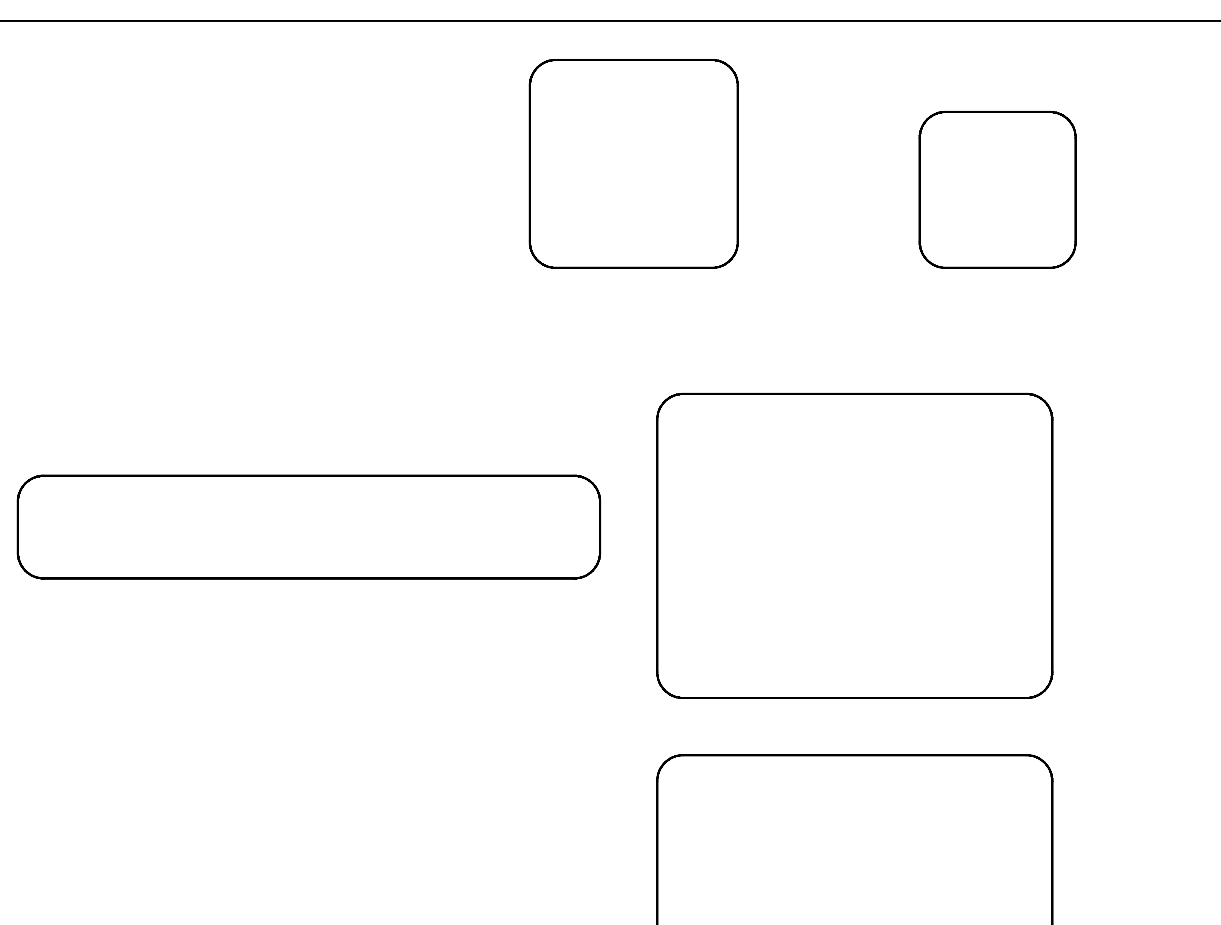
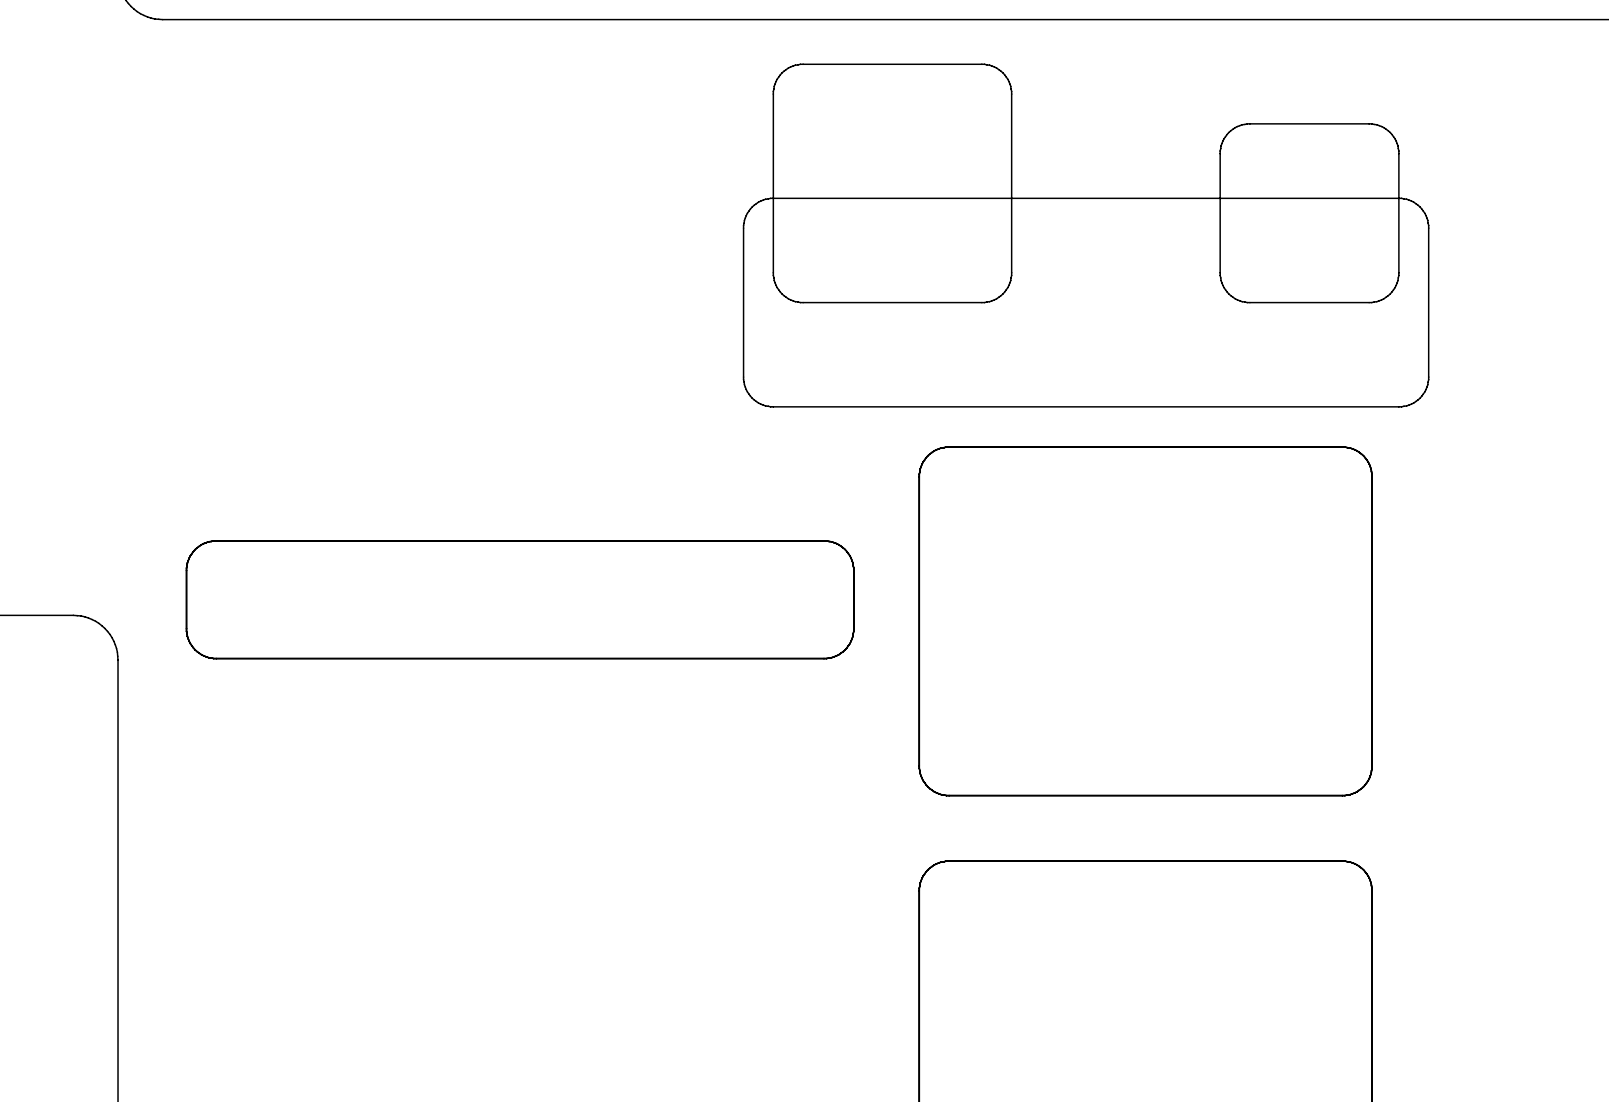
board edge: (714, 59) (553, 59) (544, 62) (537, 67) (532, 75) (529, 83) (529, 244) (532, 252) (537, 260) (544, 265) (553, 267) (714, 267) (722, 265) (730, 260) (735, 252) (737, 244) (737, 83) (735, 75) (730, 67) (722, 62) (714, 59) -> none
board edge: (1052, 111) (943, 111) (932, 115) (925, 121) (919, 135) (919, 244) (923, 254) (929, 261) (943, 267) (1052, 267) (1062, 264) (1069, 258) (1075, 244) (1075, 135) (1073, 127) (1068, 119) (1060, 114) (1052, 111) -> none
board edge: none -> (1401, 198) (765, 199) (750, 209) (743, 225) (744, 384) (754, 400) (770, 406) (1406, 405) (1421, 396) (1428, 379) (1428, 225) (1426, 215) (1420, 206) (1411, 201) (1401, 198)

